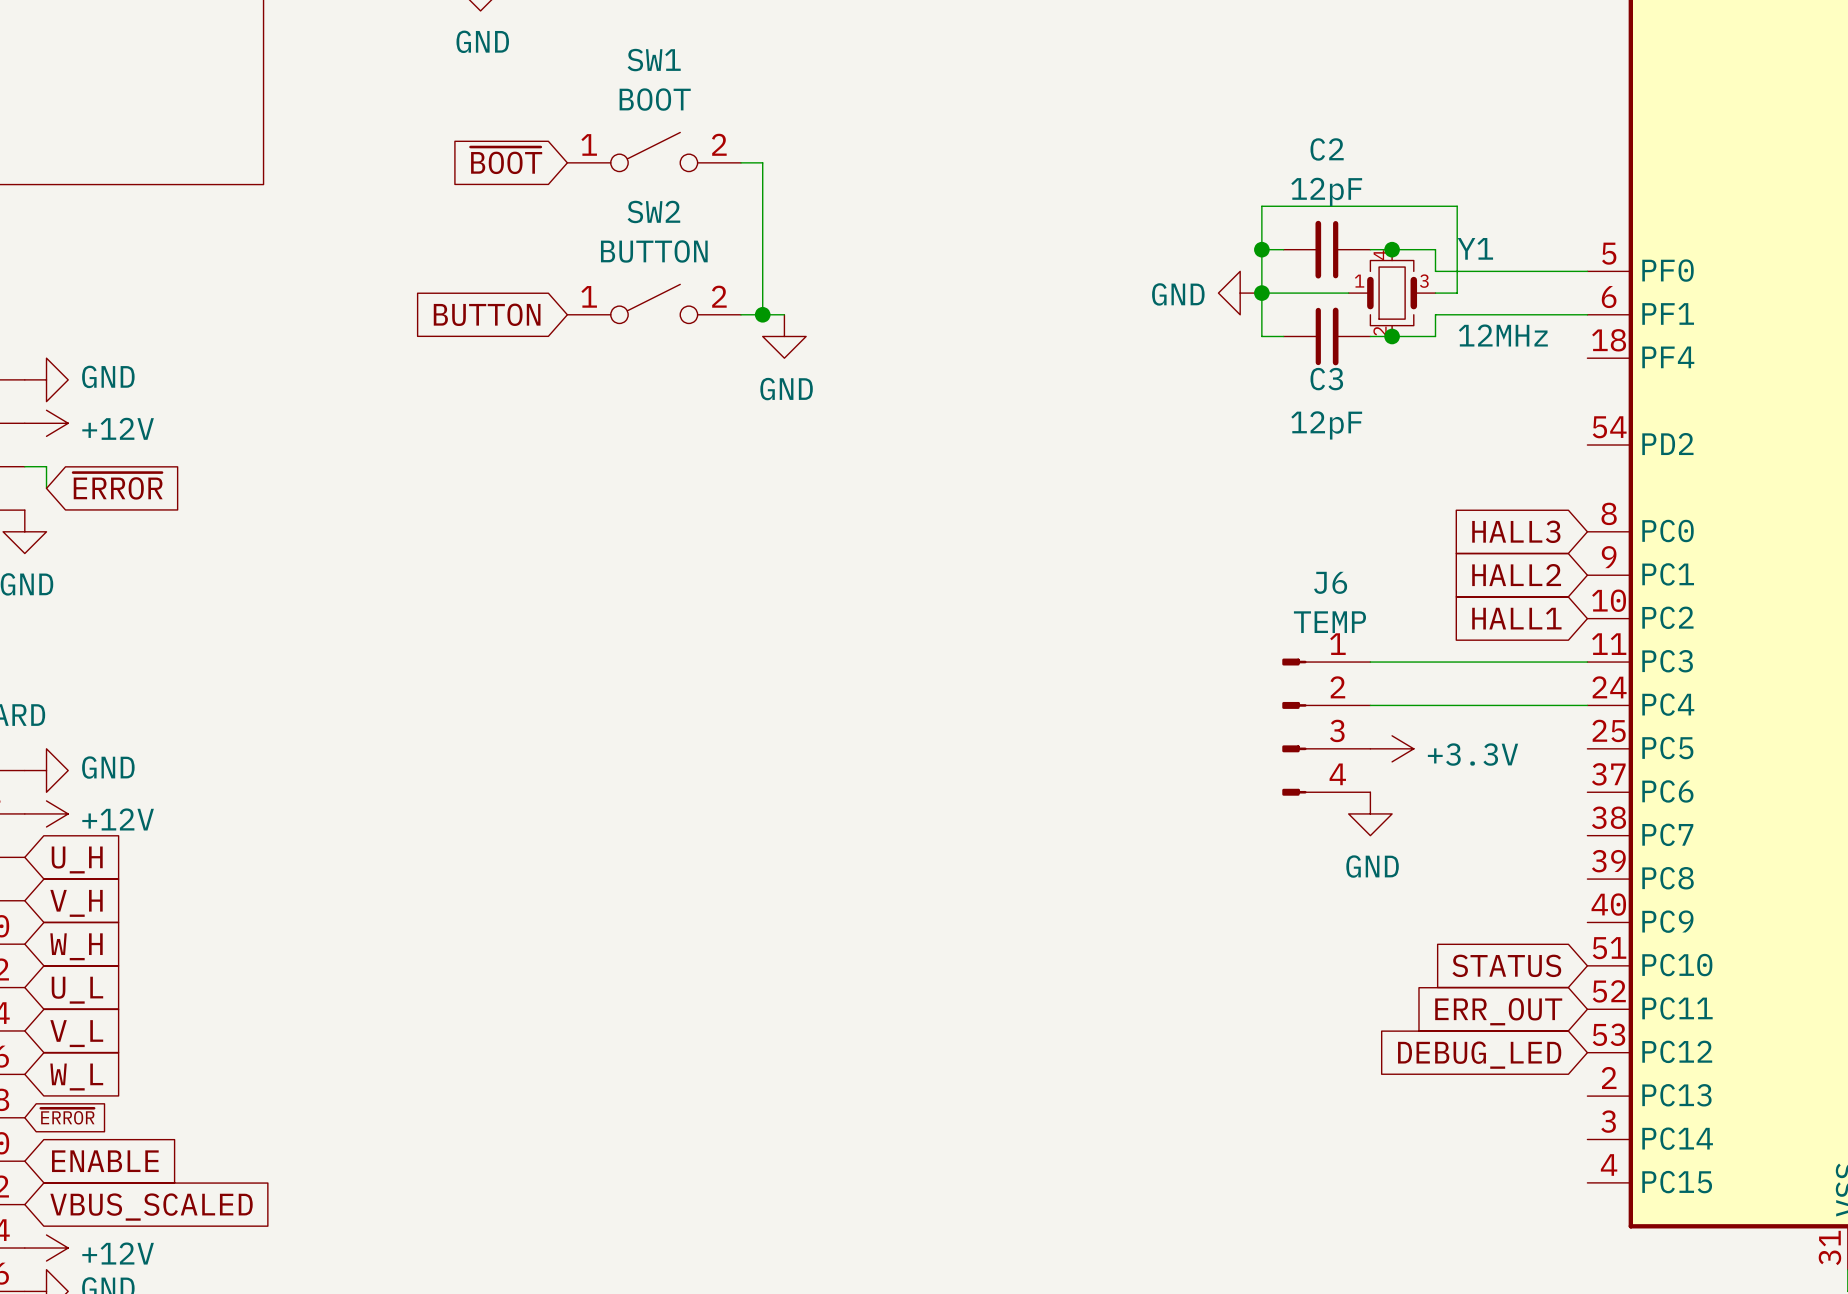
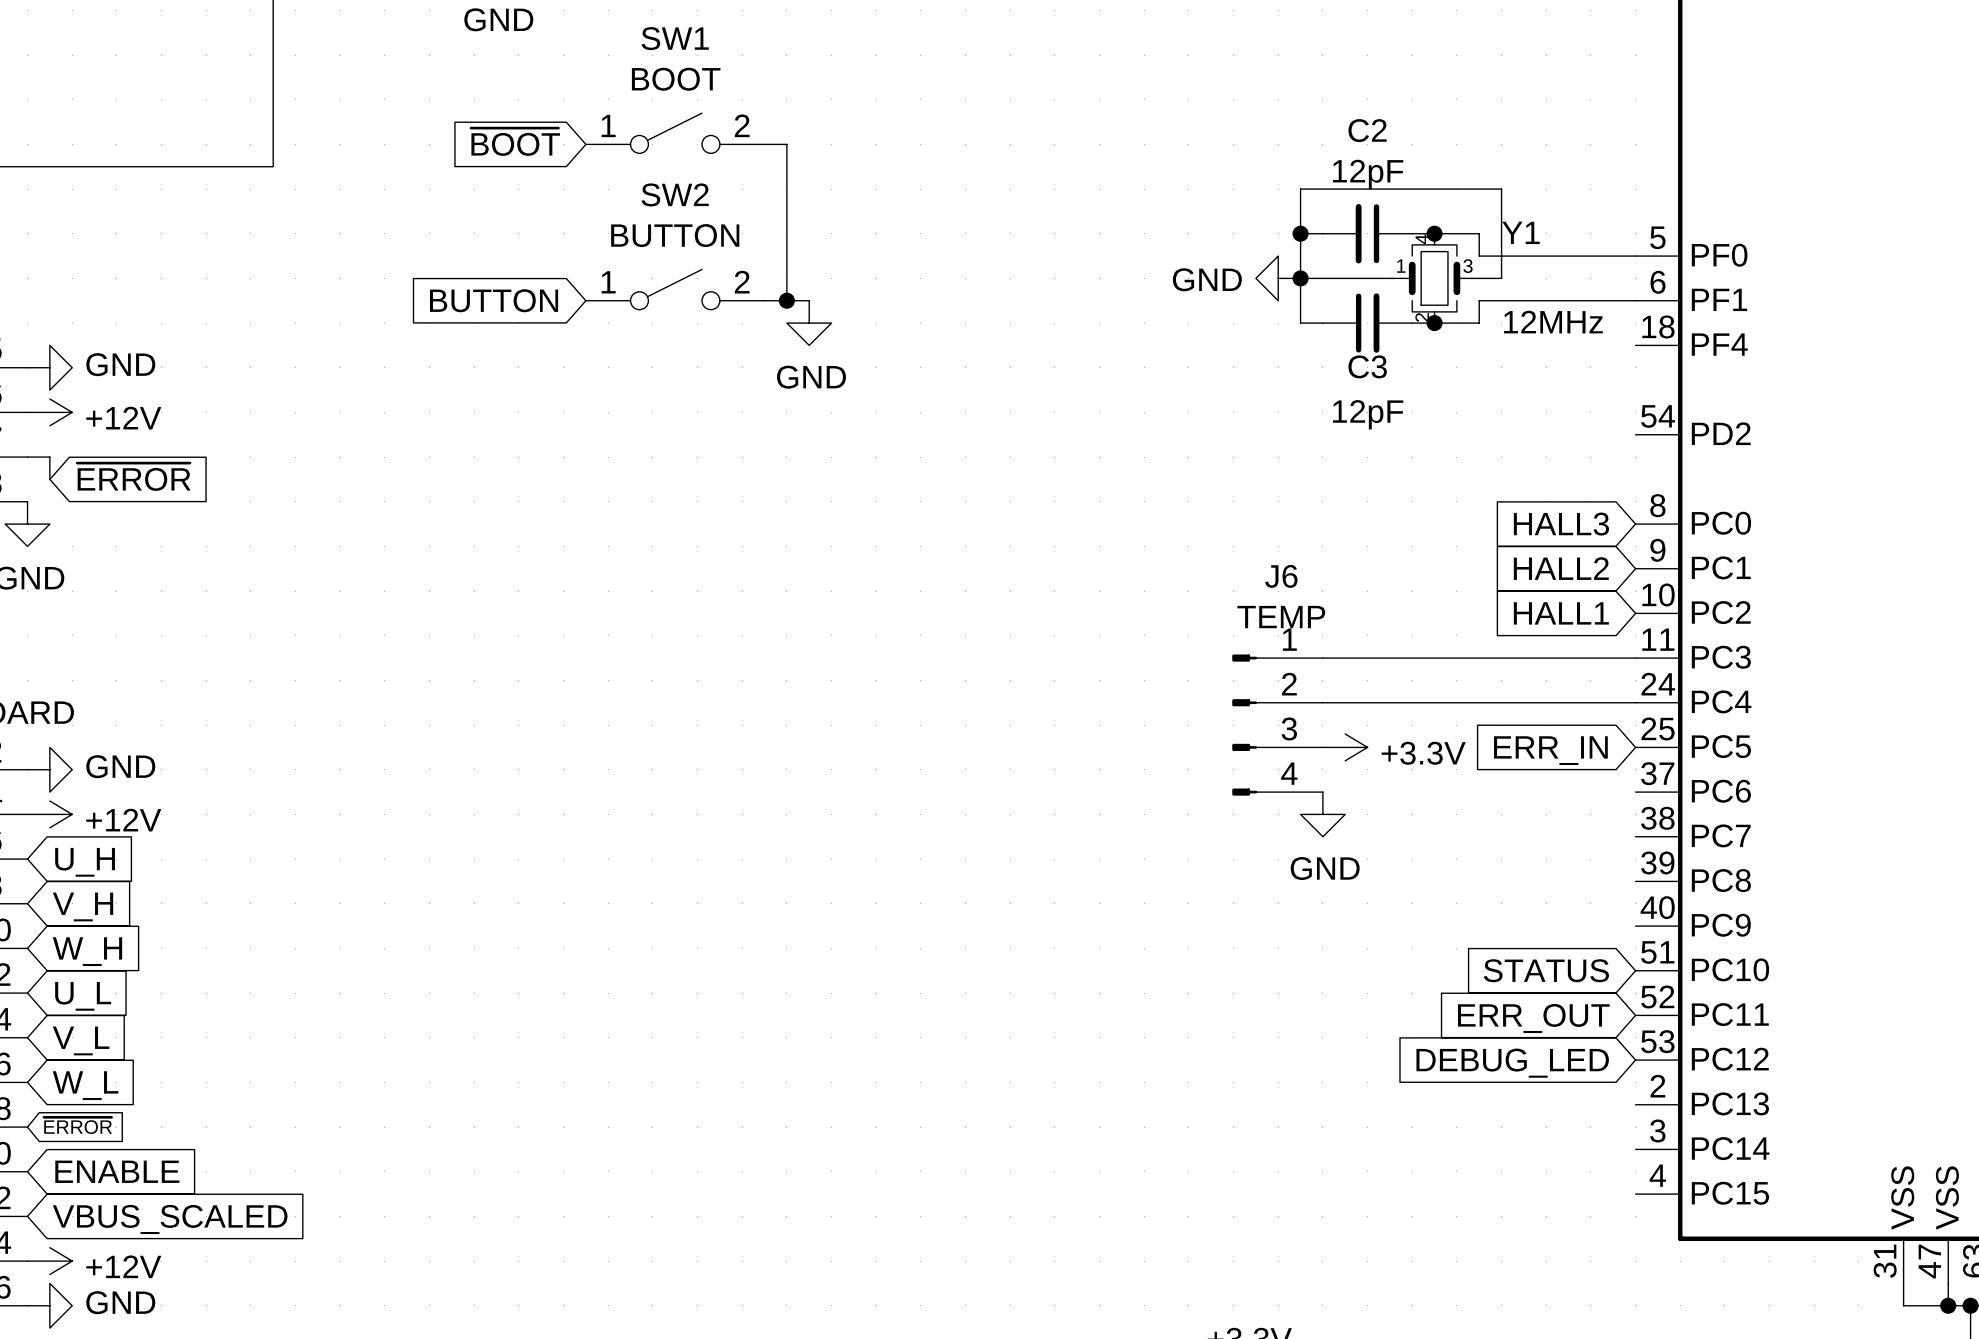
J6 position: (1326, 727) -> (1277, 725)
power symbol position: +3.3V (1392, 748) -> +3.3V (1345, 747)
global label: none -> ERR_IN (1550, 750)
power symbol position: GND (1370, 813) -> GND (1322, 814)

